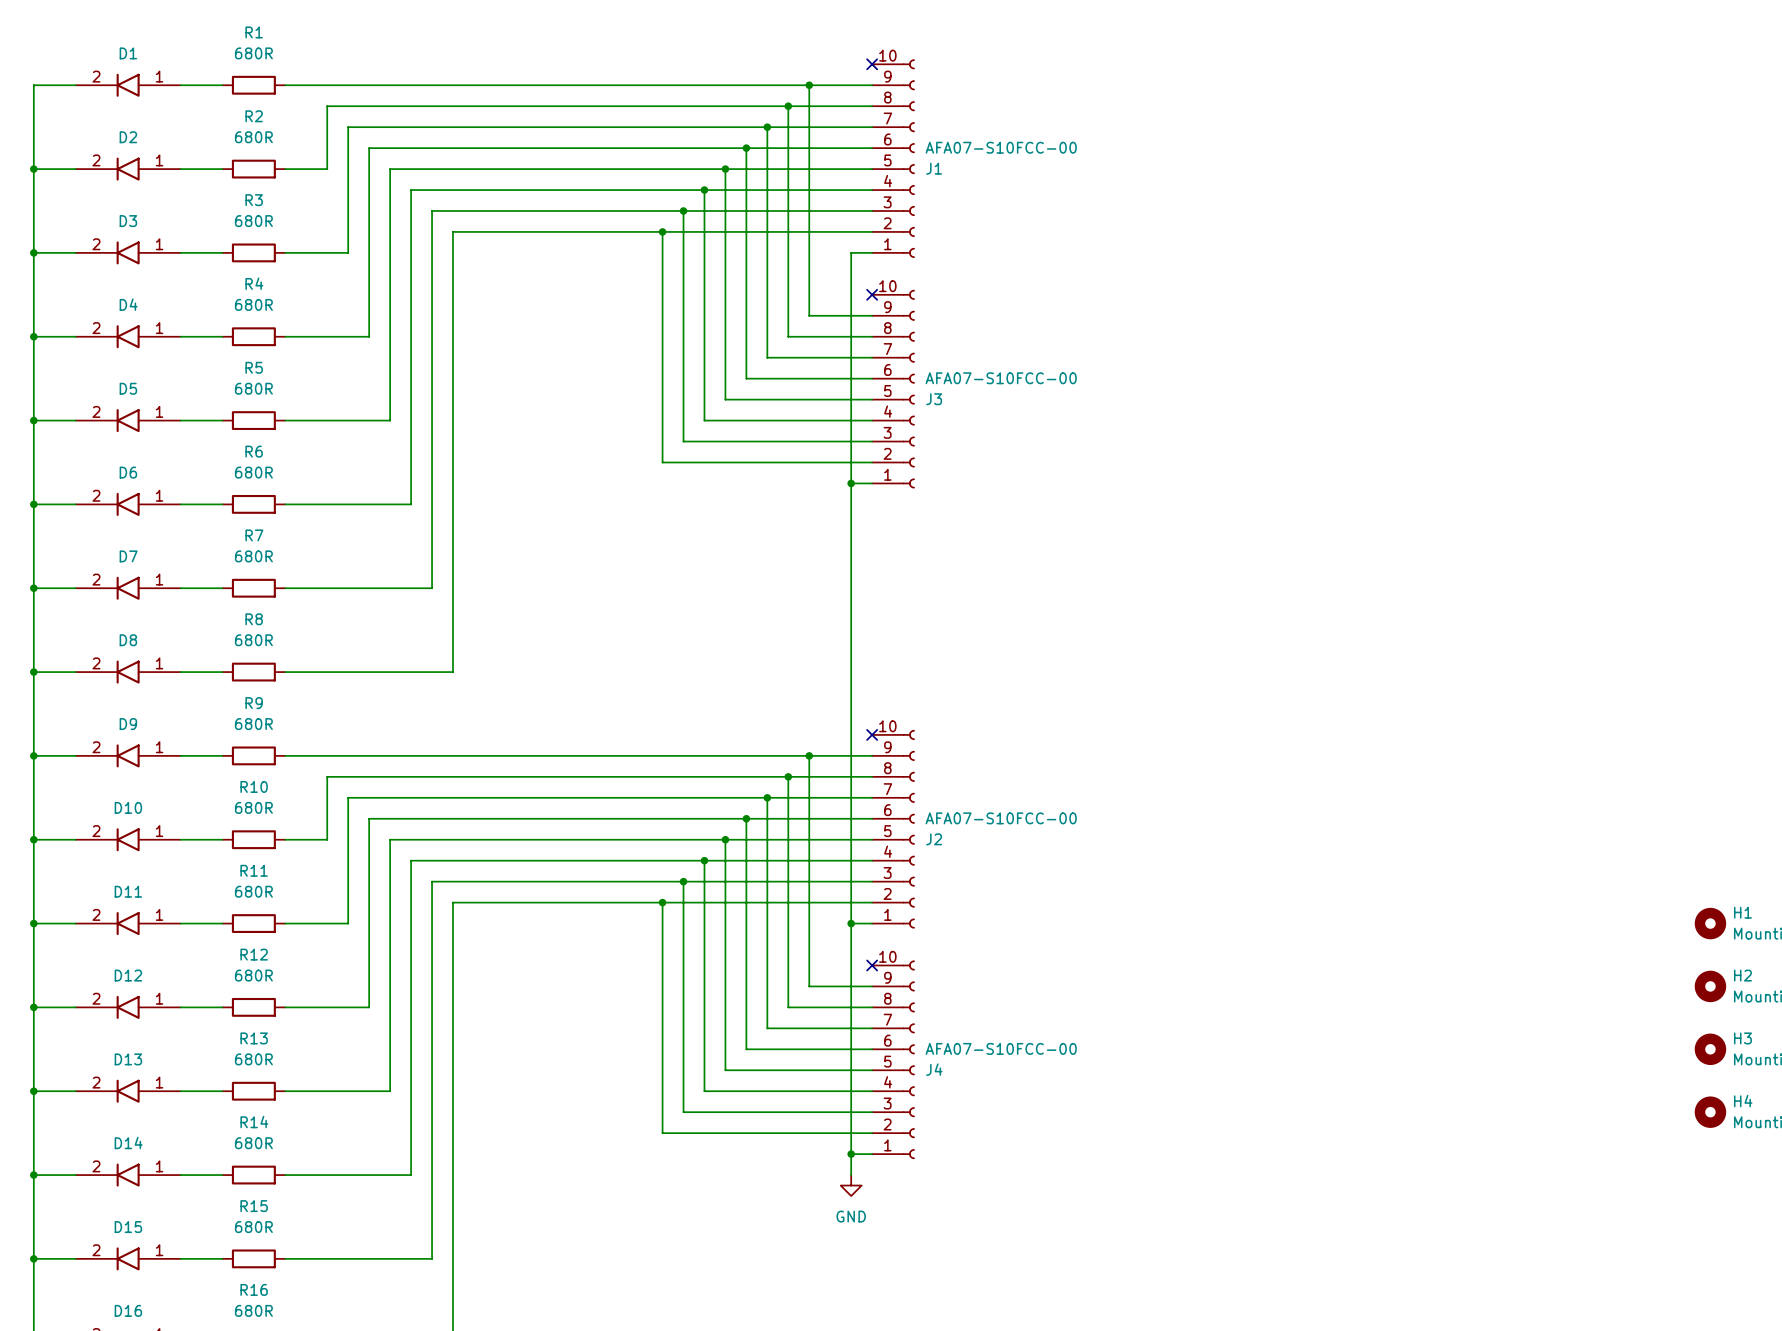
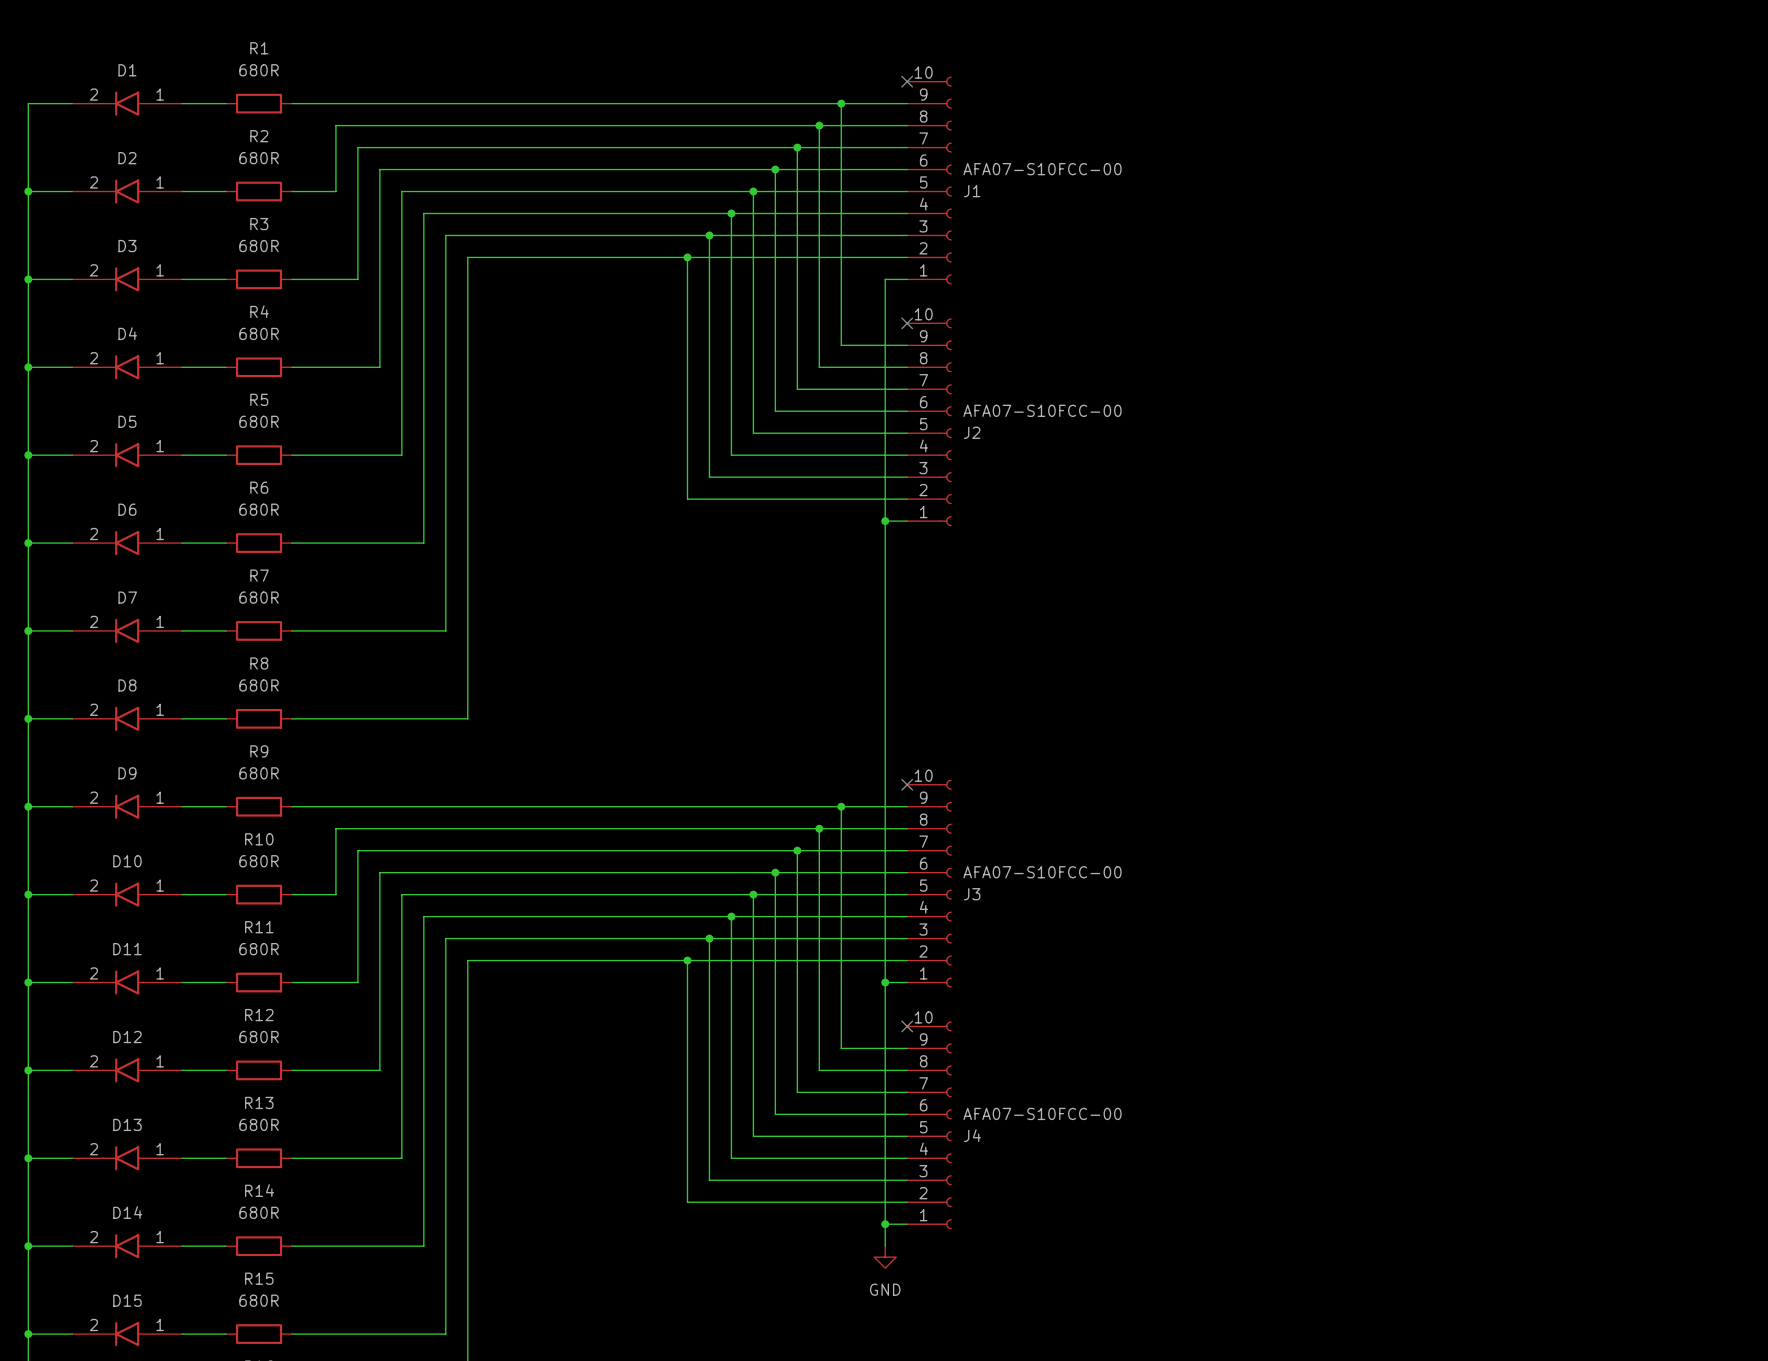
J3 name: J3 (934, 399) -> J2 (972, 432)
J2 name: J2 (934, 839) -> J3 (972, 894)

